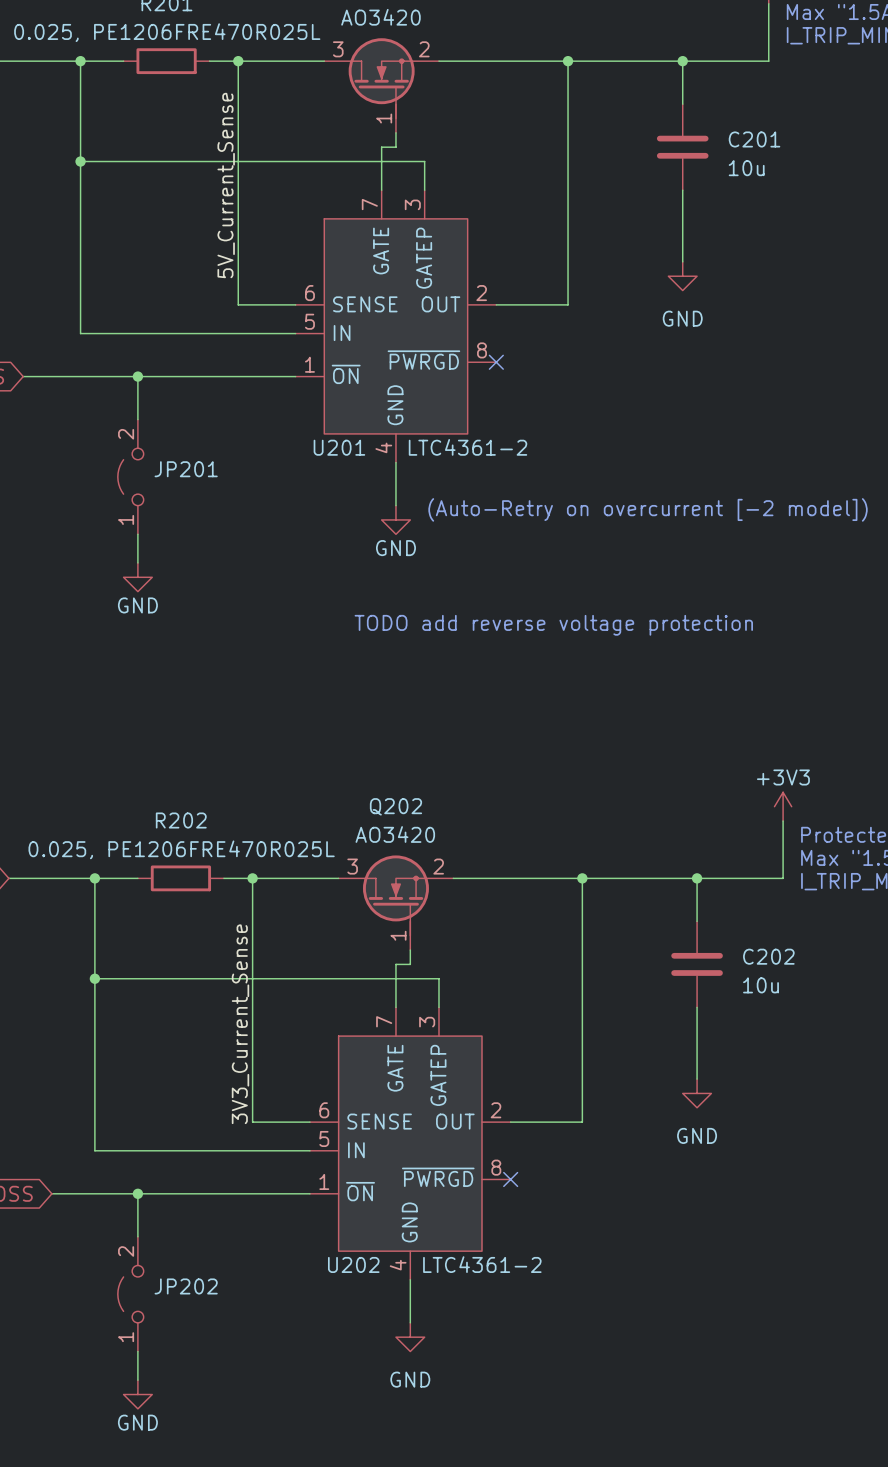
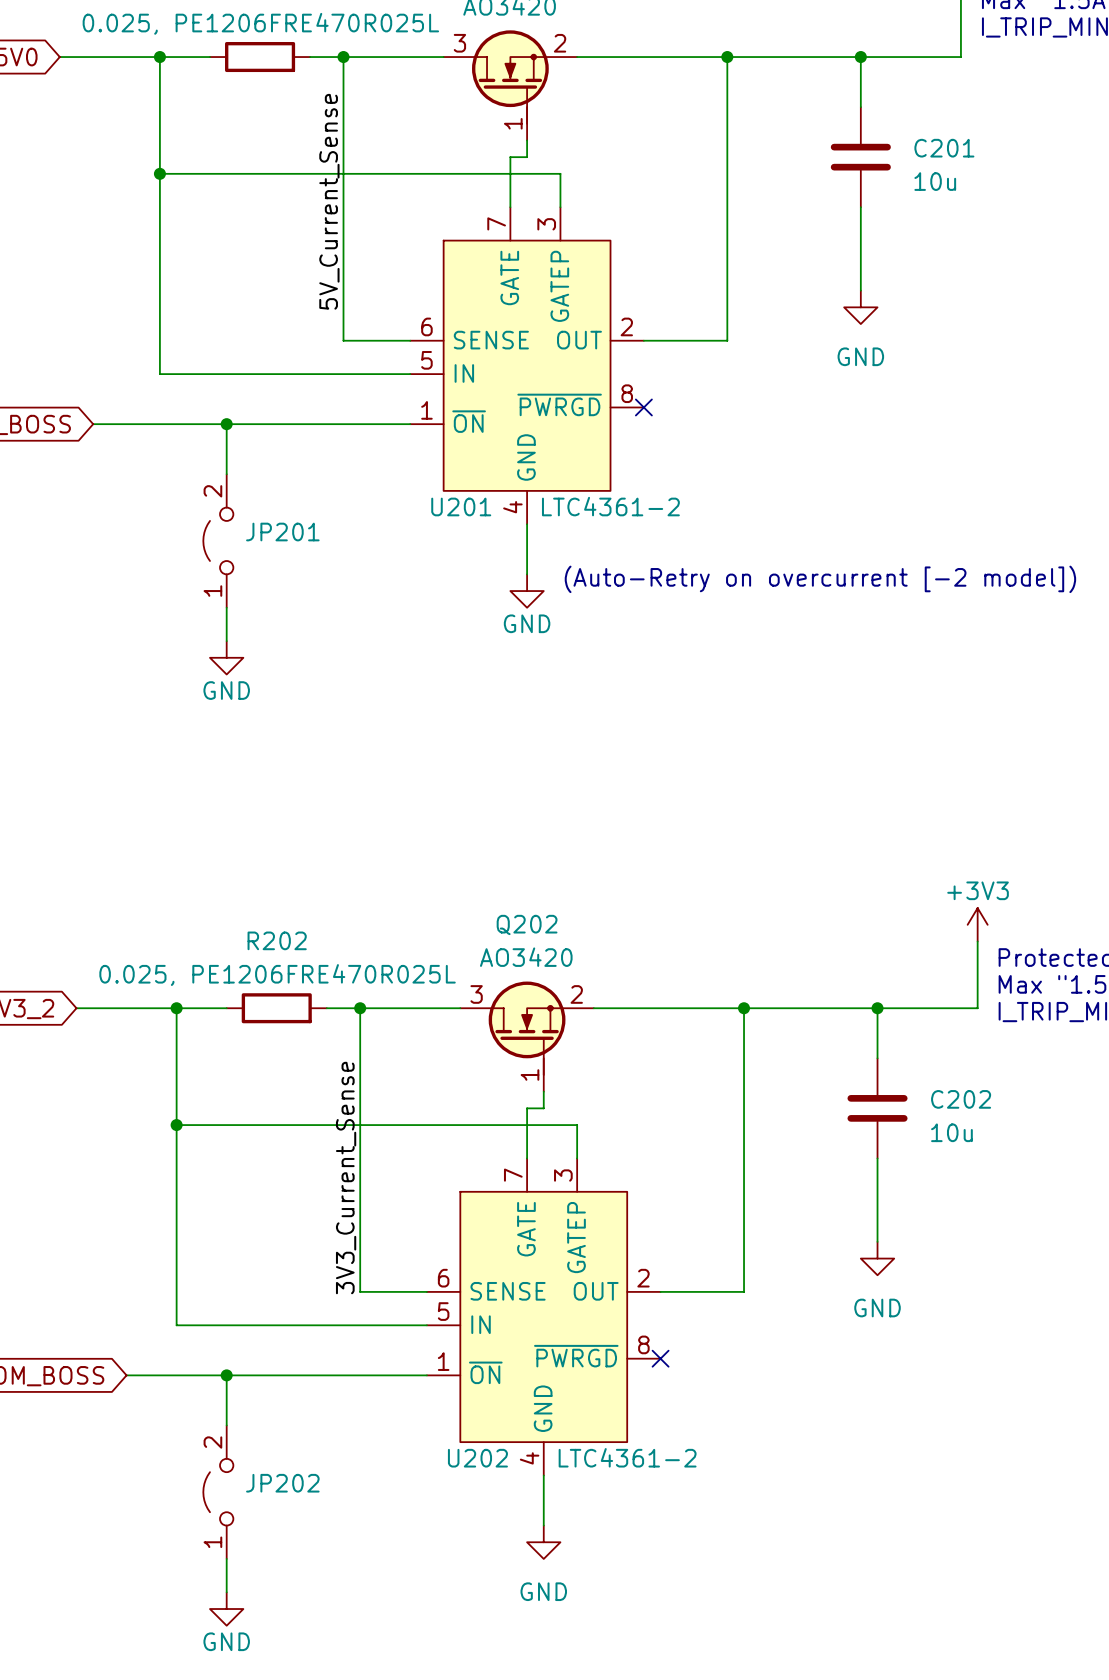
text: TODO add reverse voltage protection (553, 625) -> none

